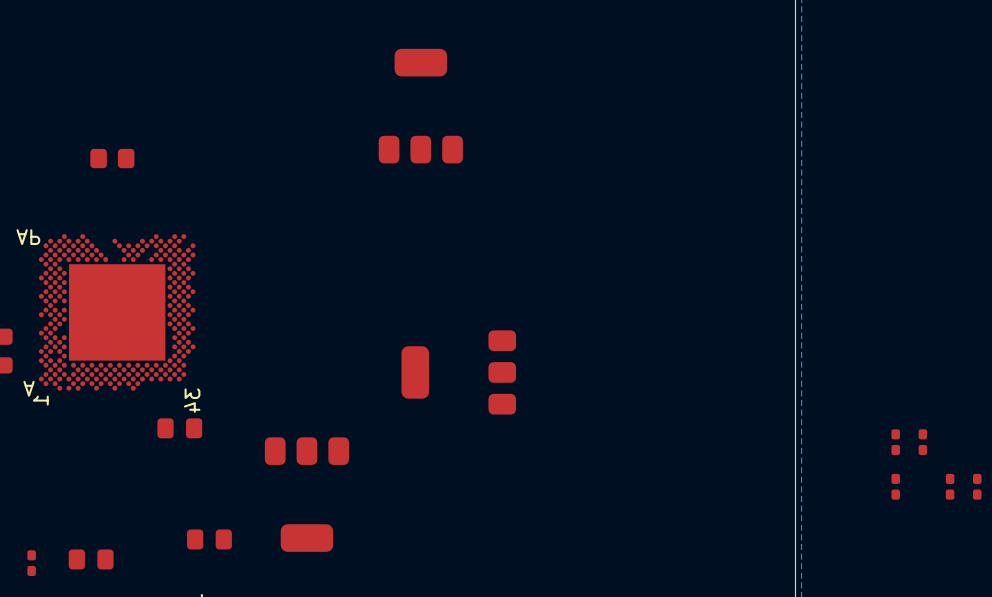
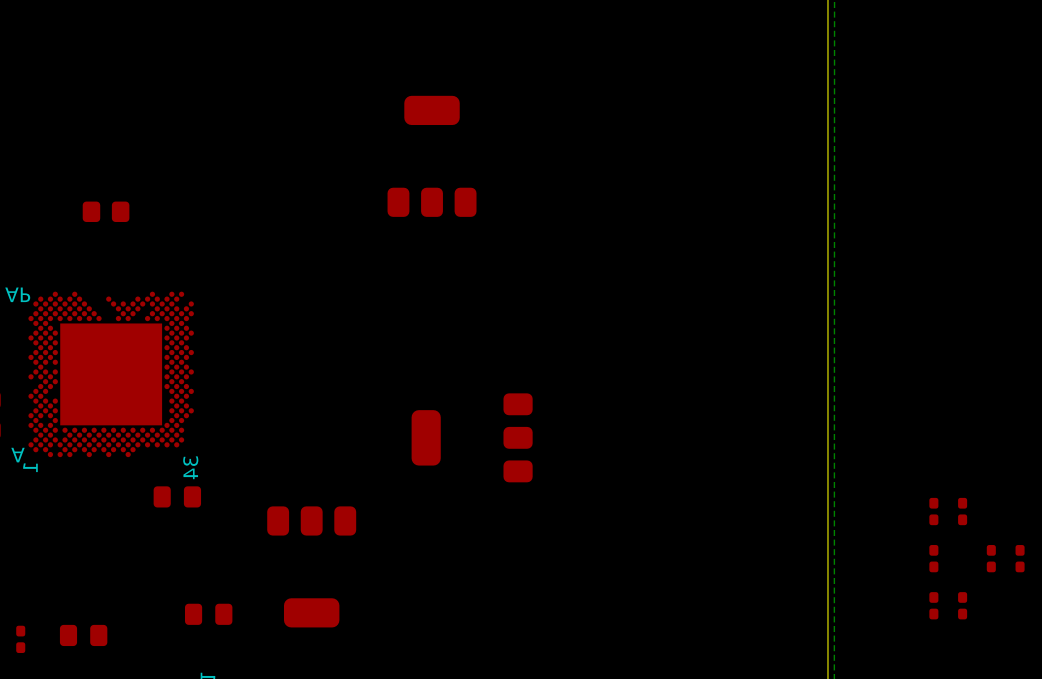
part: none -> (933, 605)
part: none -> (962, 605)

